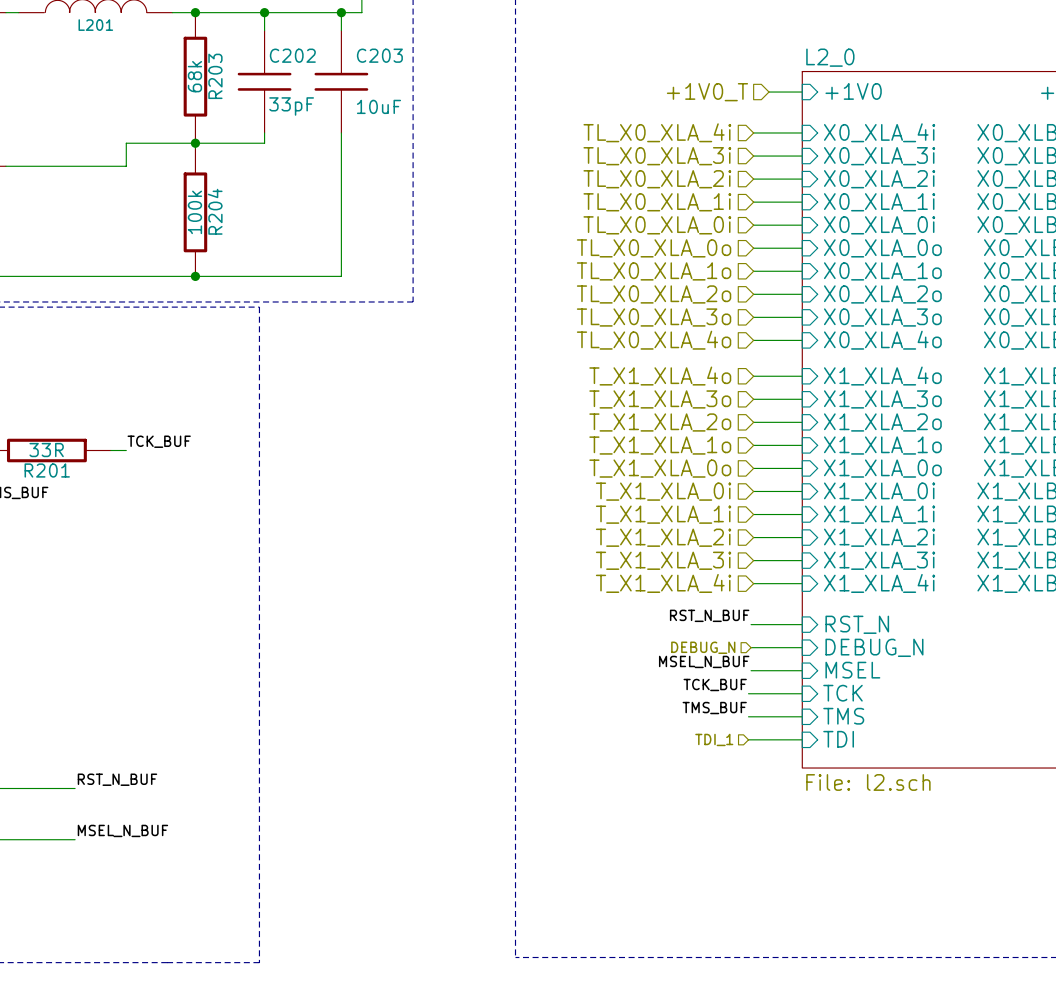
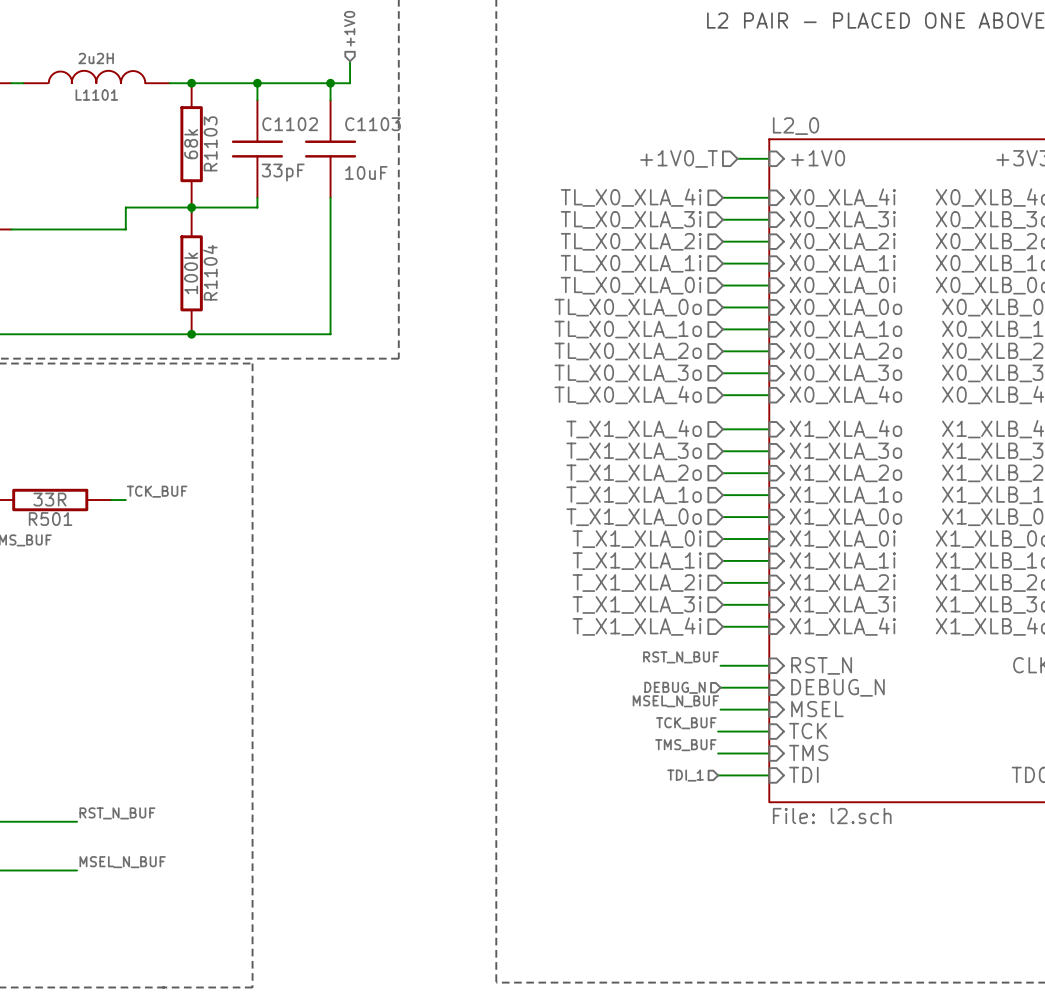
L201 name: L201 (95, 25) -> L1101 (96, 95)
C202 name: C202 (292, 55) -> C1102 (290, 124)
C203 name: C203 (379, 55) -> C1103 (373, 124)
R203 name: R203 (215, 76) -> R1103 (210, 143)
R204 name: R204 (215, 211) -> R1104 (210, 272)
R201 name: R201 (47, 470) -> R501 (50, 519)

